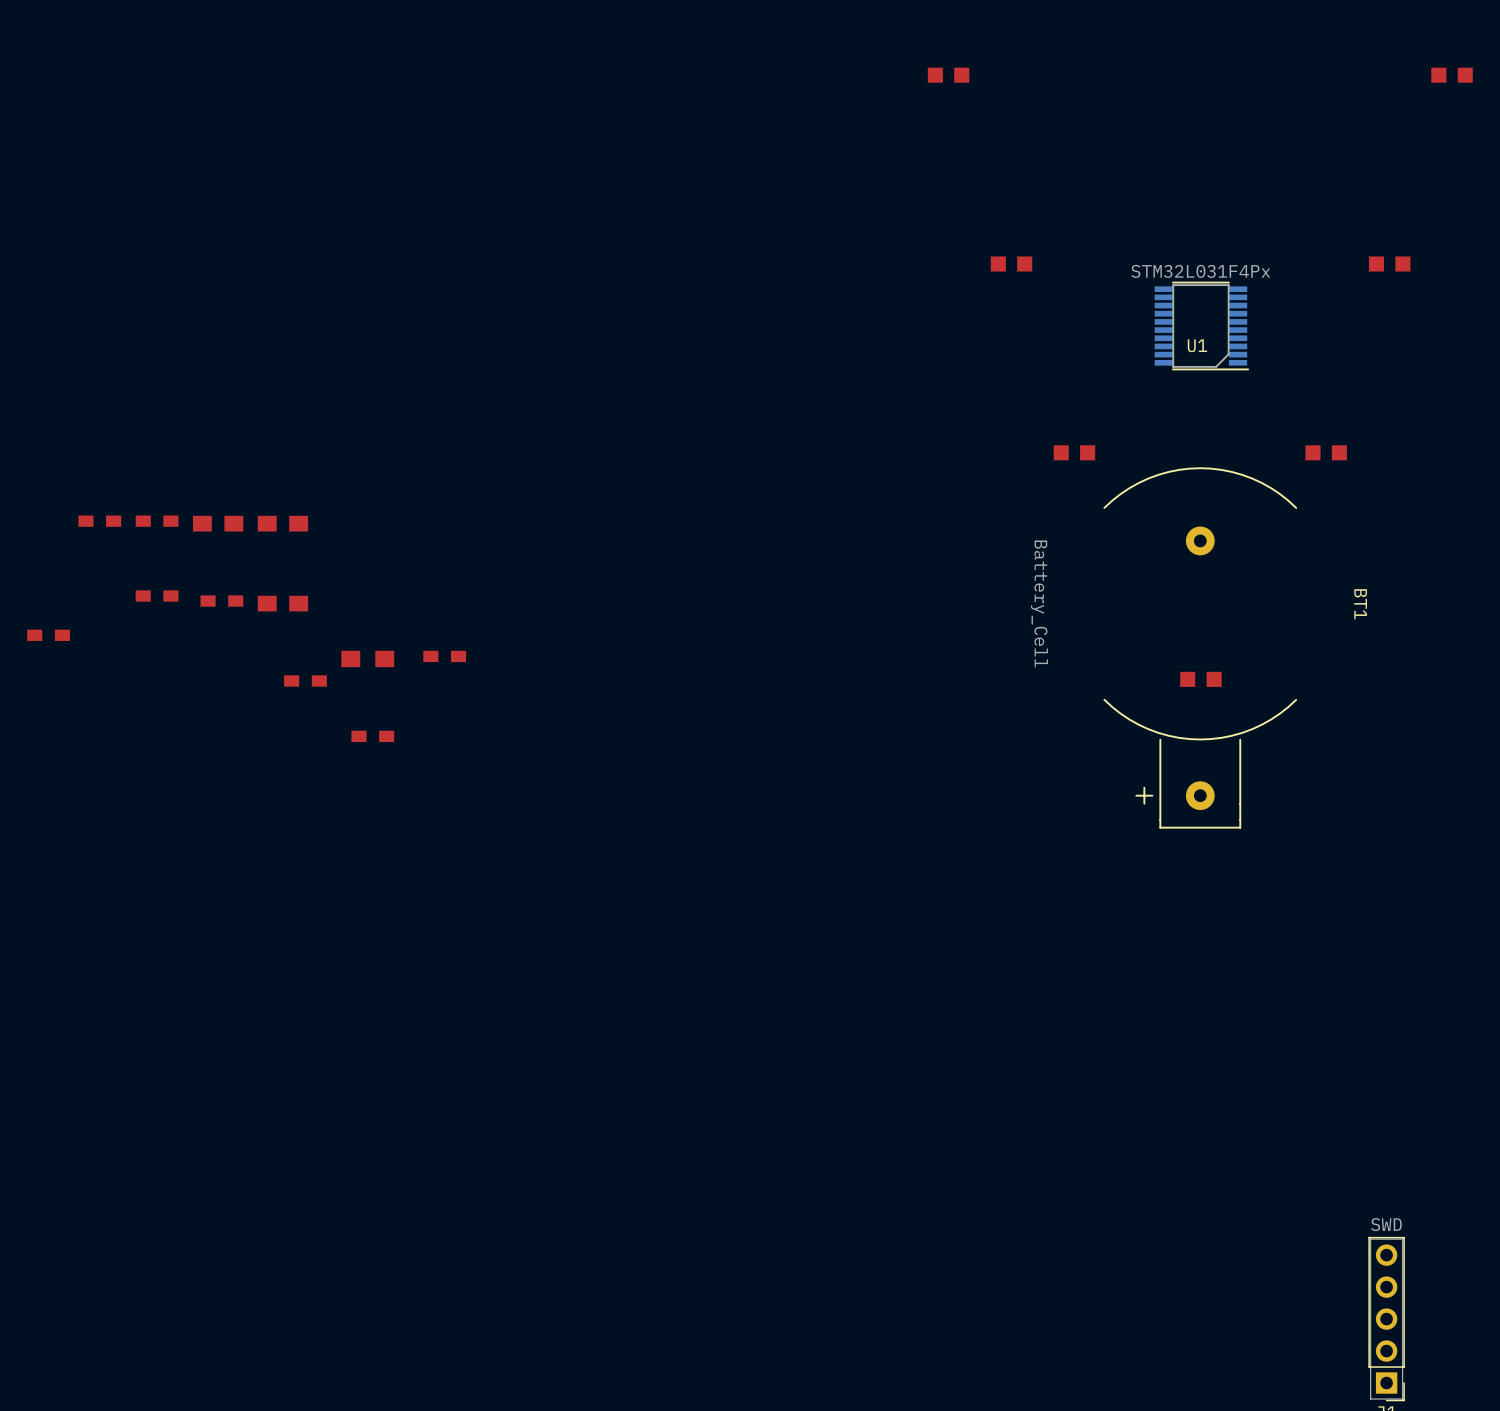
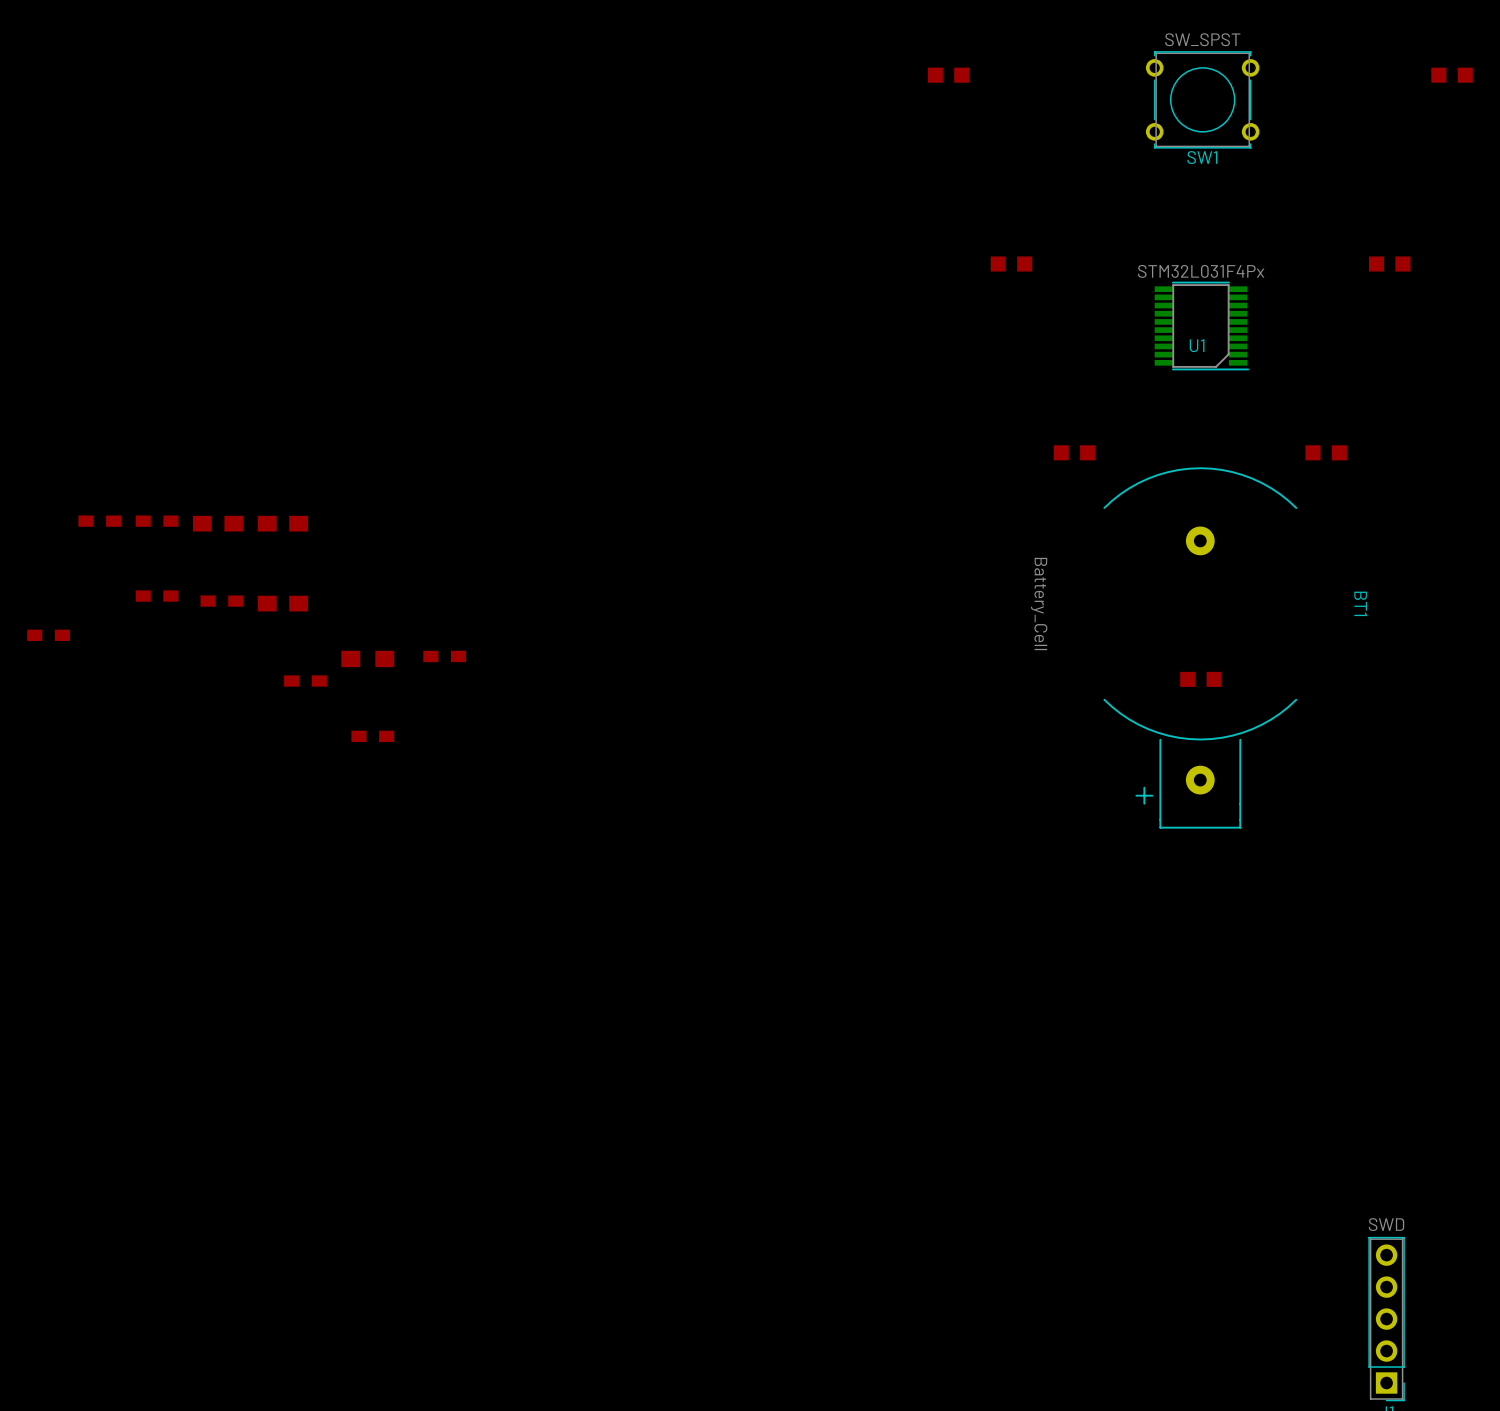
SW1: none -> SW_SPST (1202, 99)
BT1 footprint: [1103, 467, 1298, 829] -> [1103, 467, 1298, 829]

